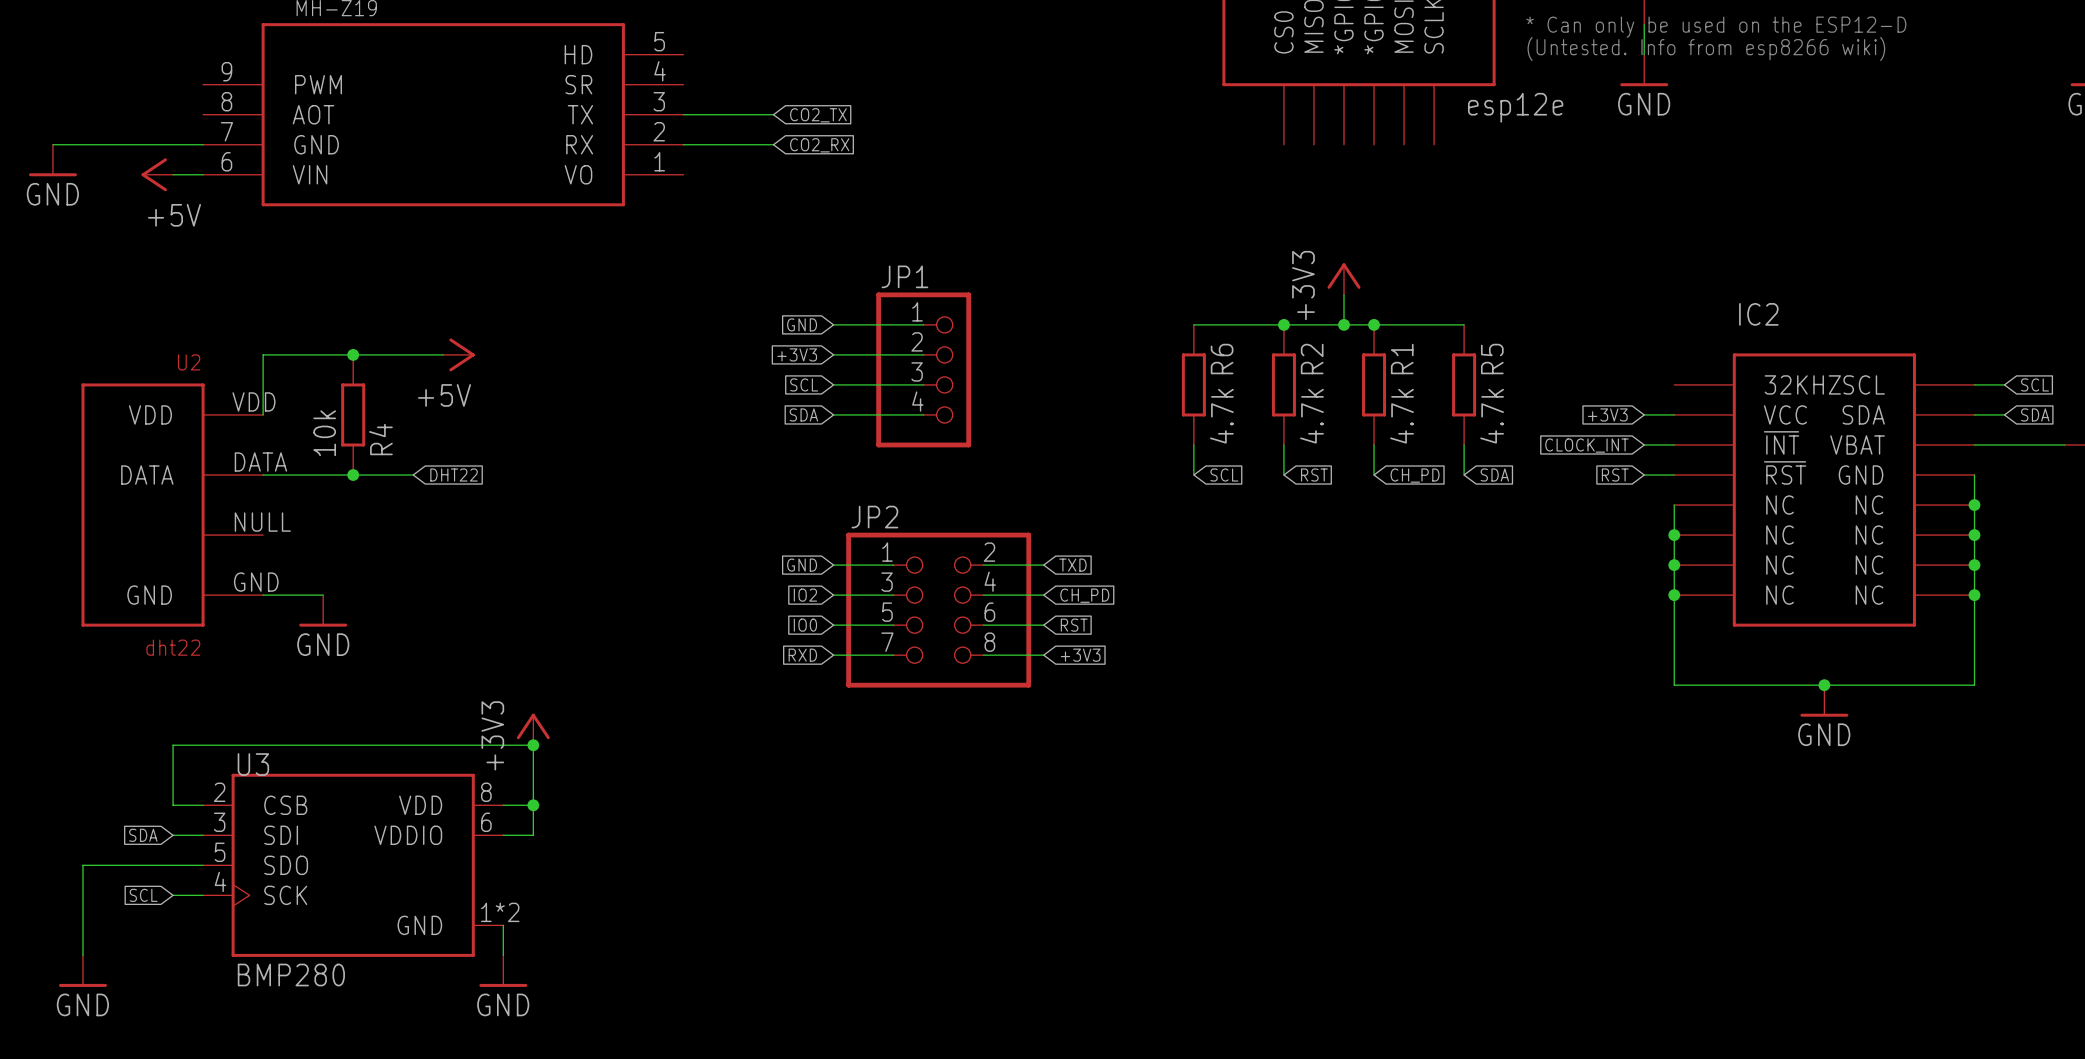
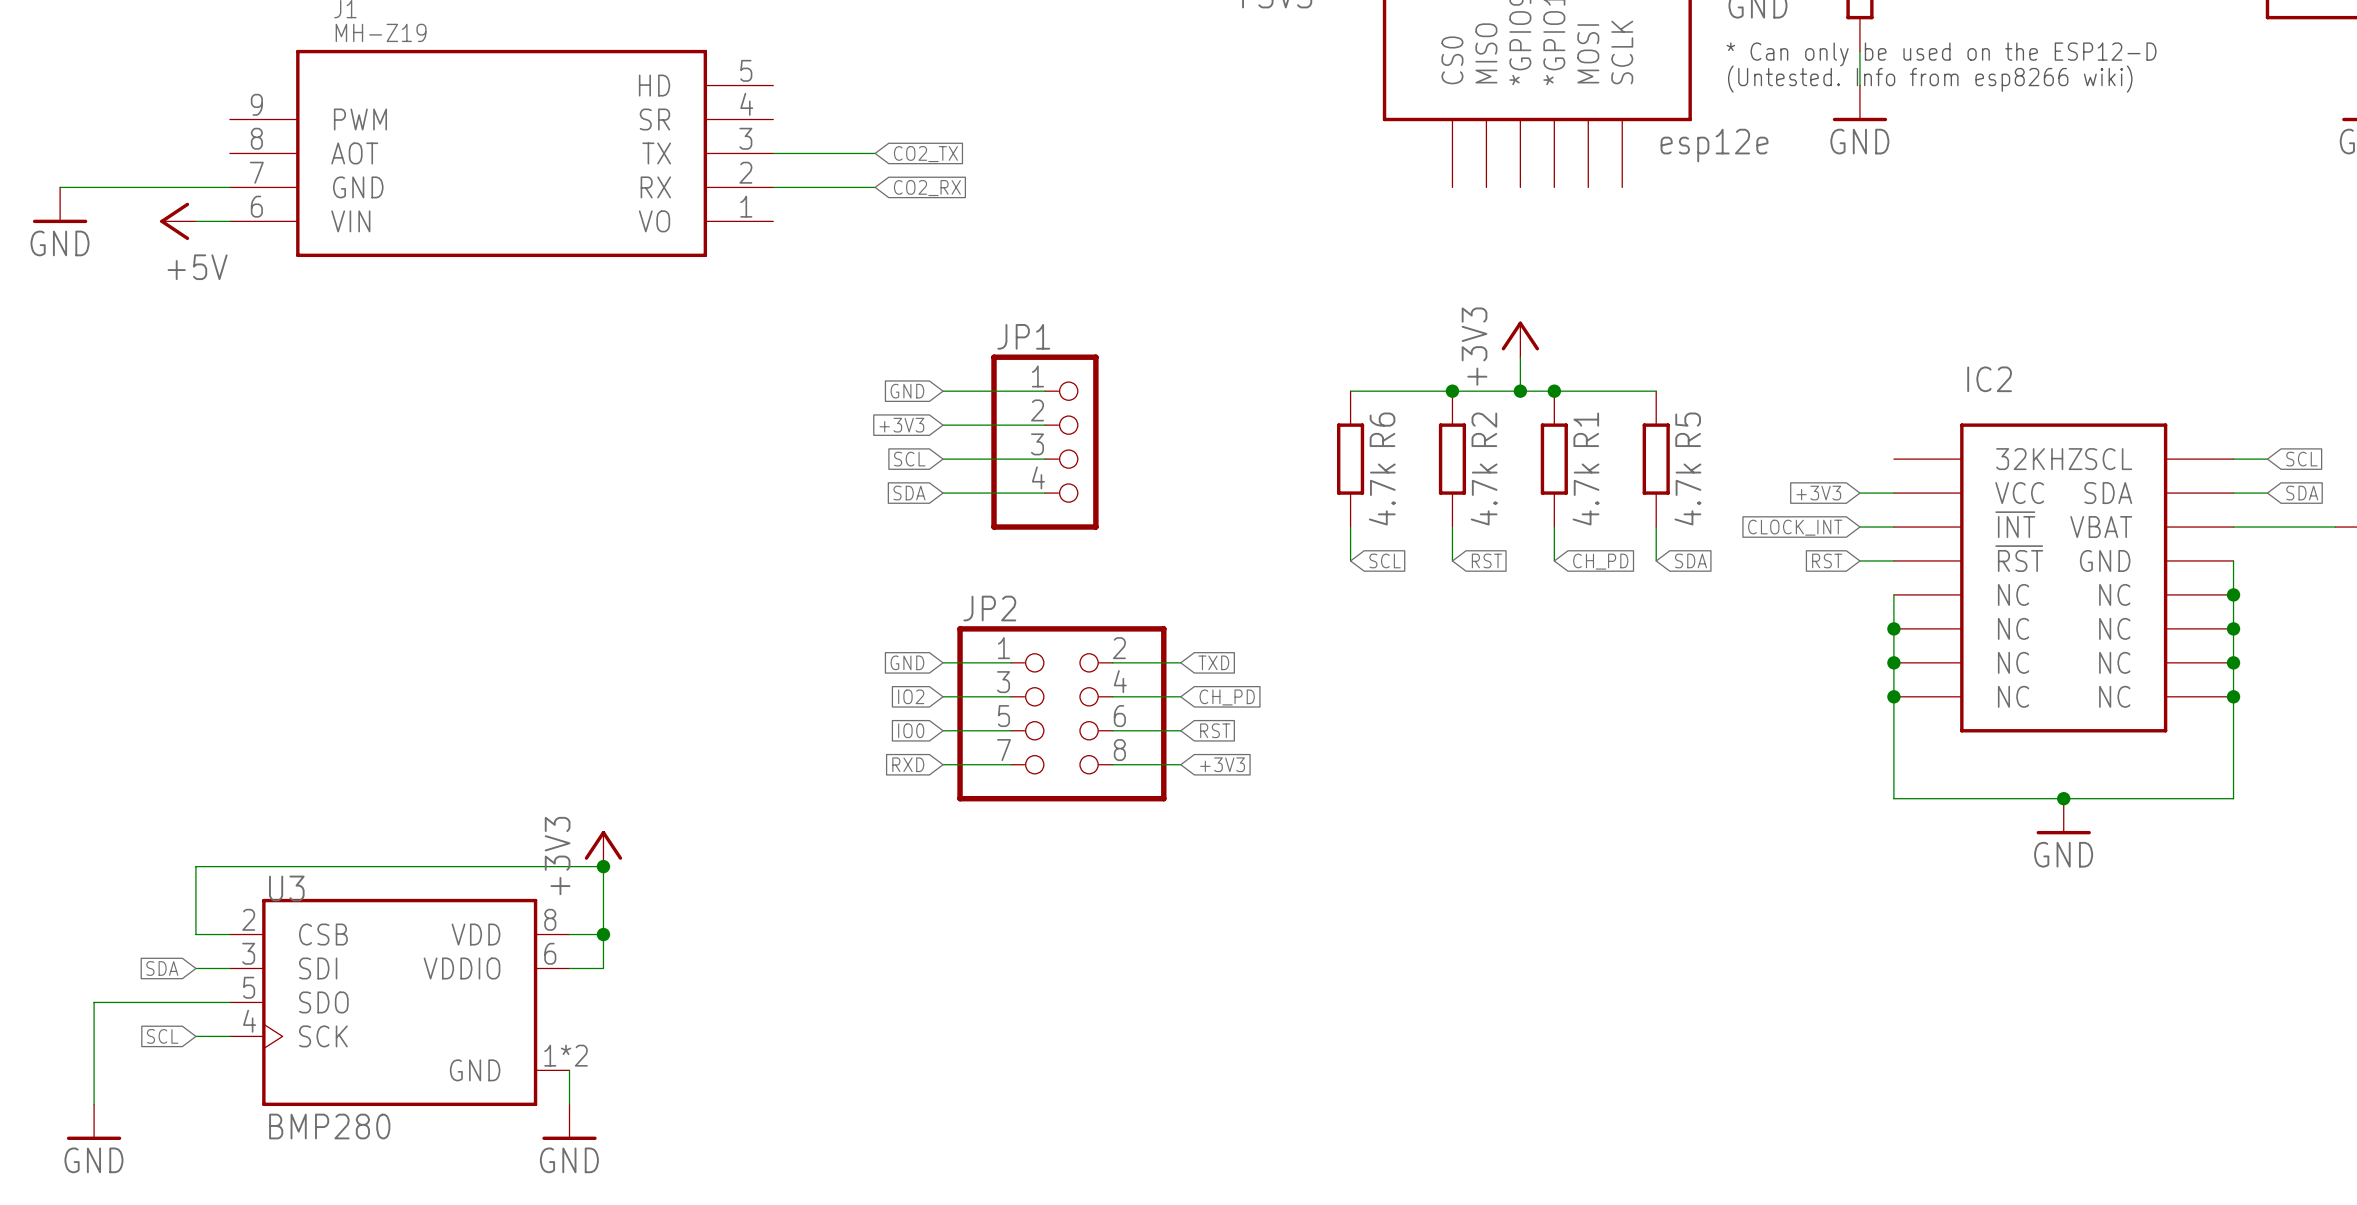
junction: (353, 354) -> none
wire: (443, 354) (263, 354) (263, 414) -> none
power symbol: +5V (459, 354) -> none
R4: 10k (353, 414) -> none
wire: (263, 475) (413, 475) -> none
junction: (353, 475) -> none
global label: DHT22 (454, 475) -> none
U2: dht22 (172, 505) -> none
wire: (263, 595) (323, 595) -> none
power symbol: GND (323, 610) -> none

